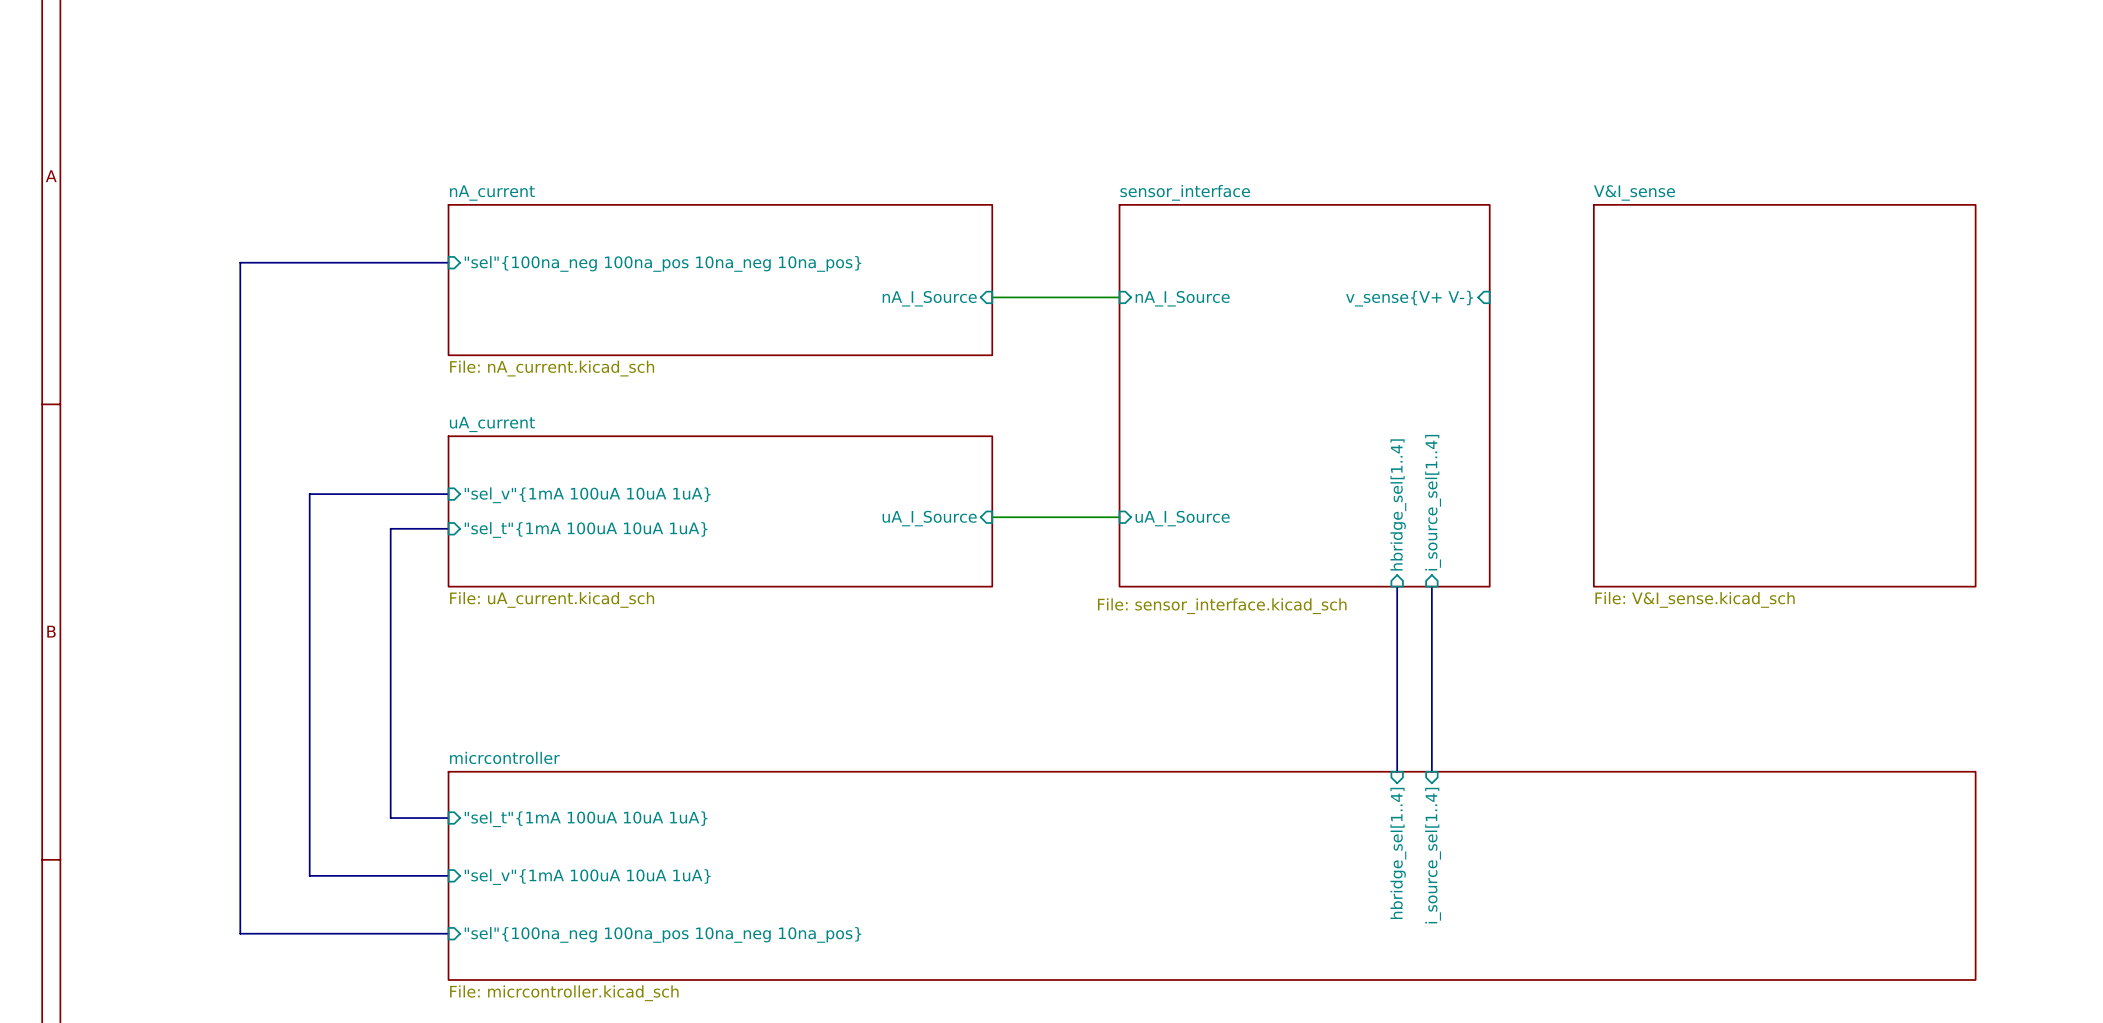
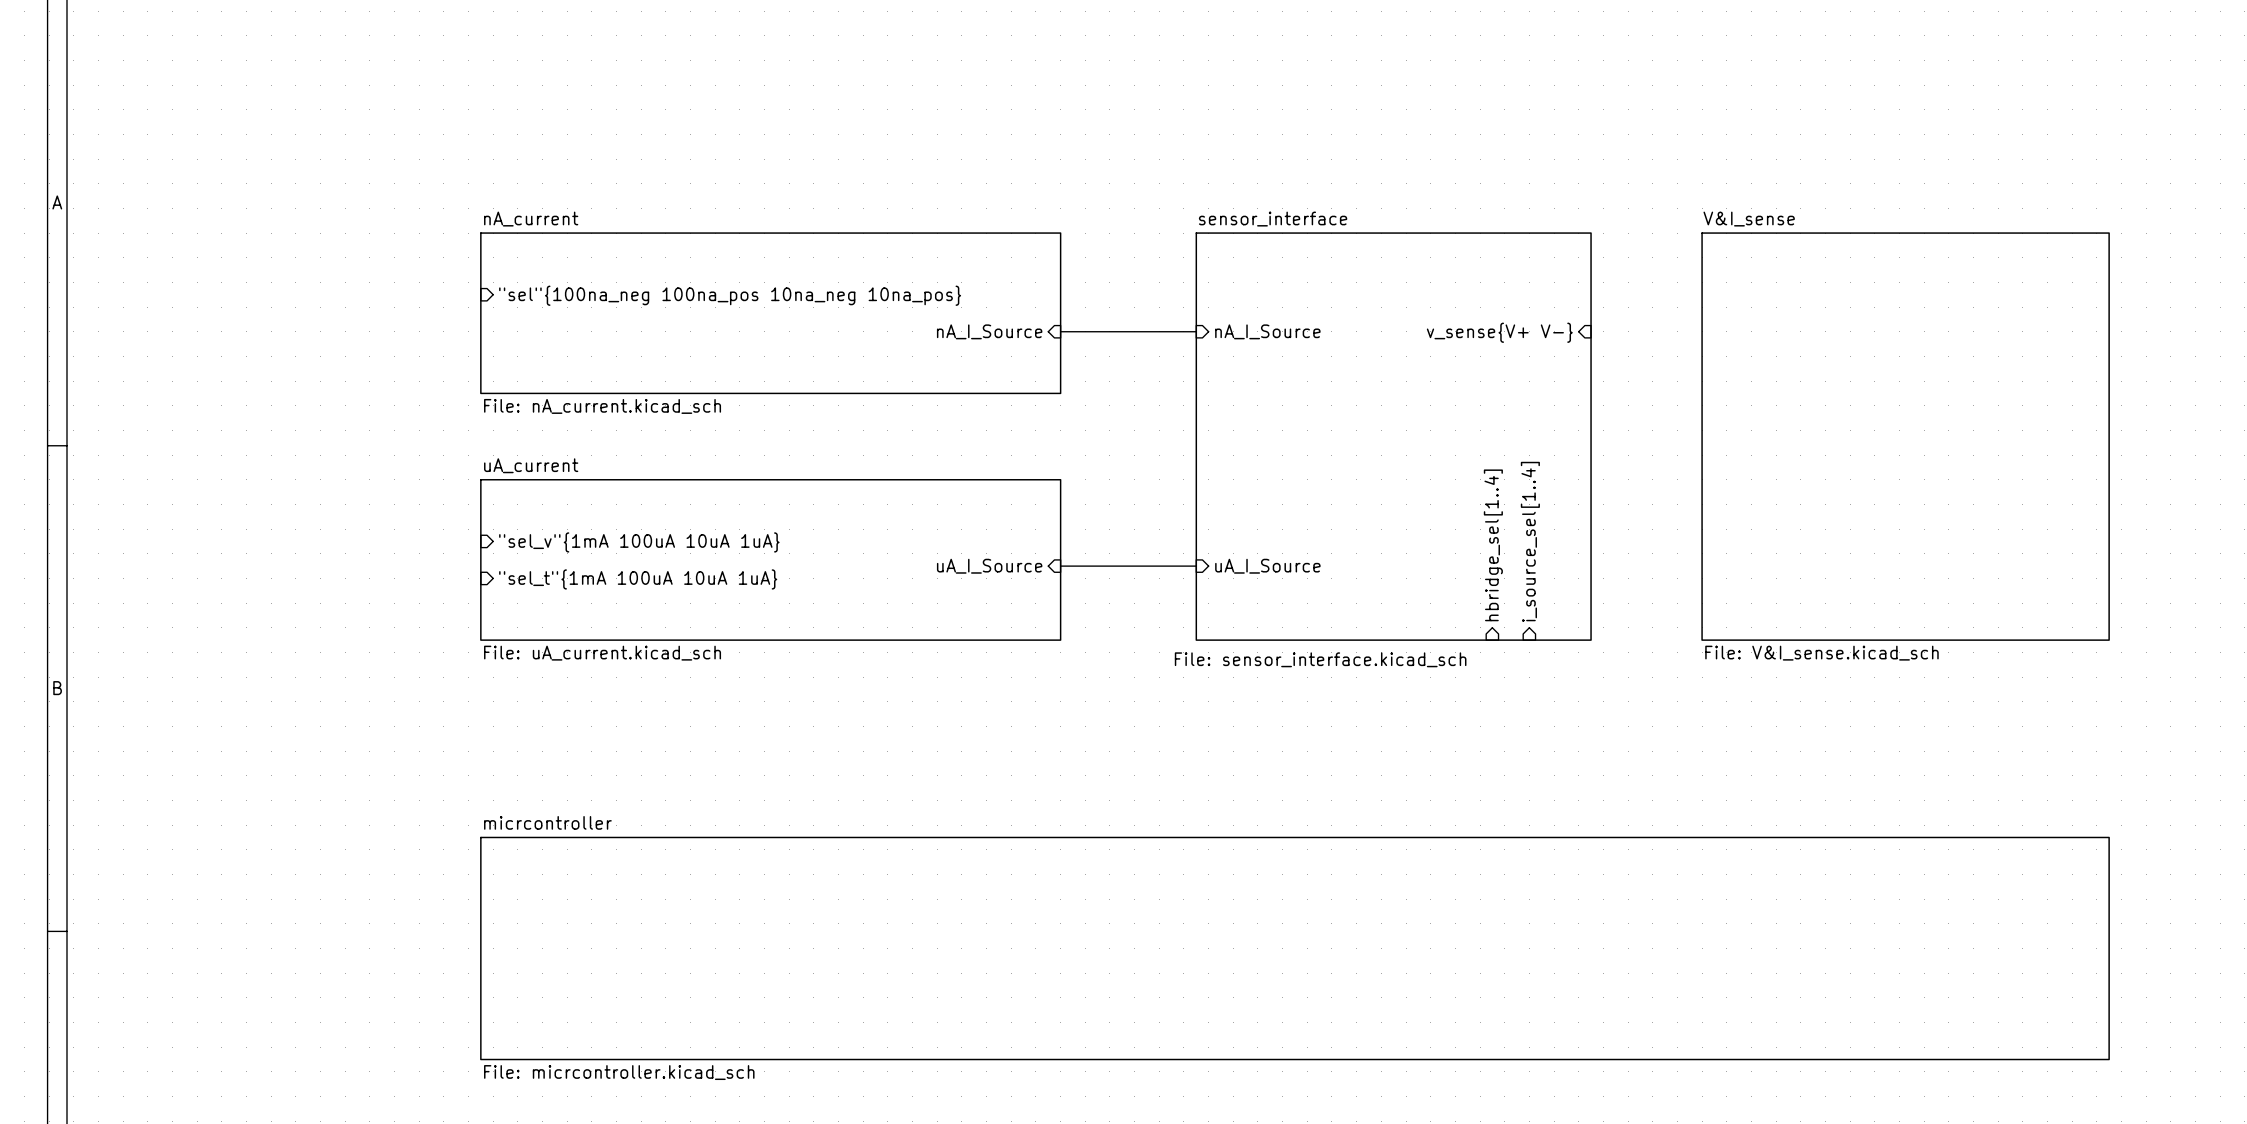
bus: (448, 262) (240, 262) (240, 933) (448, 933) -> none
bus: (448, 494) (309, 494) (309, 875) (448, 875) -> none
bus: (448, 528) (390, 528) (390, 818) (448, 818) -> none
bus: (1397, 586) (1397, 771) -> none
bus: (1431, 586) (1431, 771) -> none
sheet pin: "sel_t"{1mA 100uA 10uA 1uA} (586, 819) -> none
sheet pin: hbridge_sel[1..4] (1398, 853) -> none
sheet pin: i_source_sel[1..4] (1433, 855) -> none
sheet pin: "sel_v"{1mA 100uA 10uA 1uA} (587, 877) -> none
sheet pin: "sel"{100na_neg 100na_pos 10na_neg 10na_pos} (663, 934) -> none

